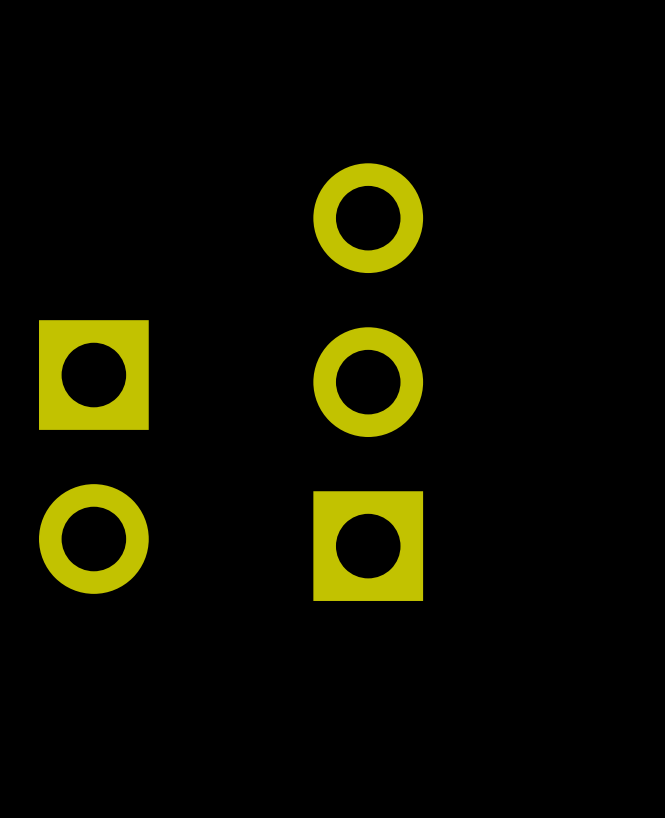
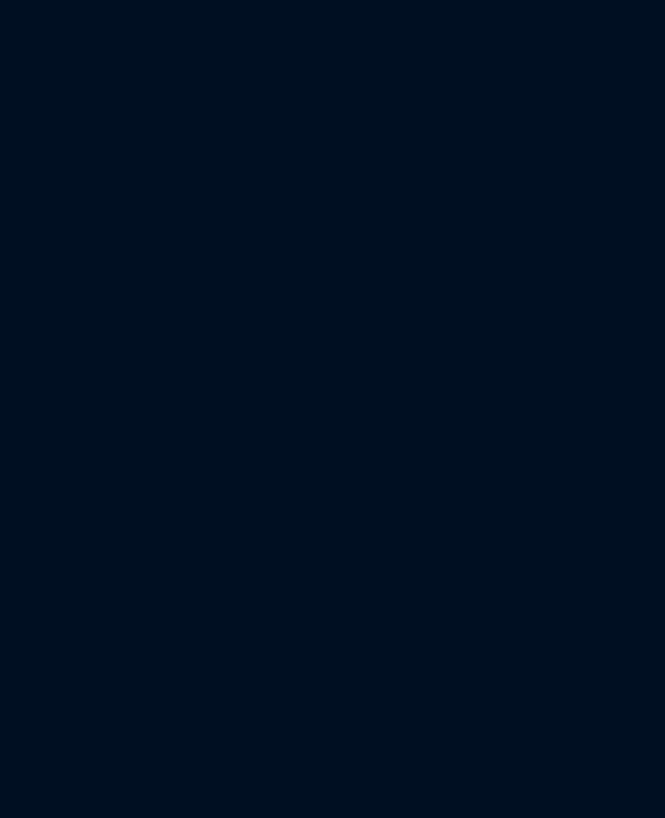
part: (368, 382) -> none
part: (93, 457) -> none

